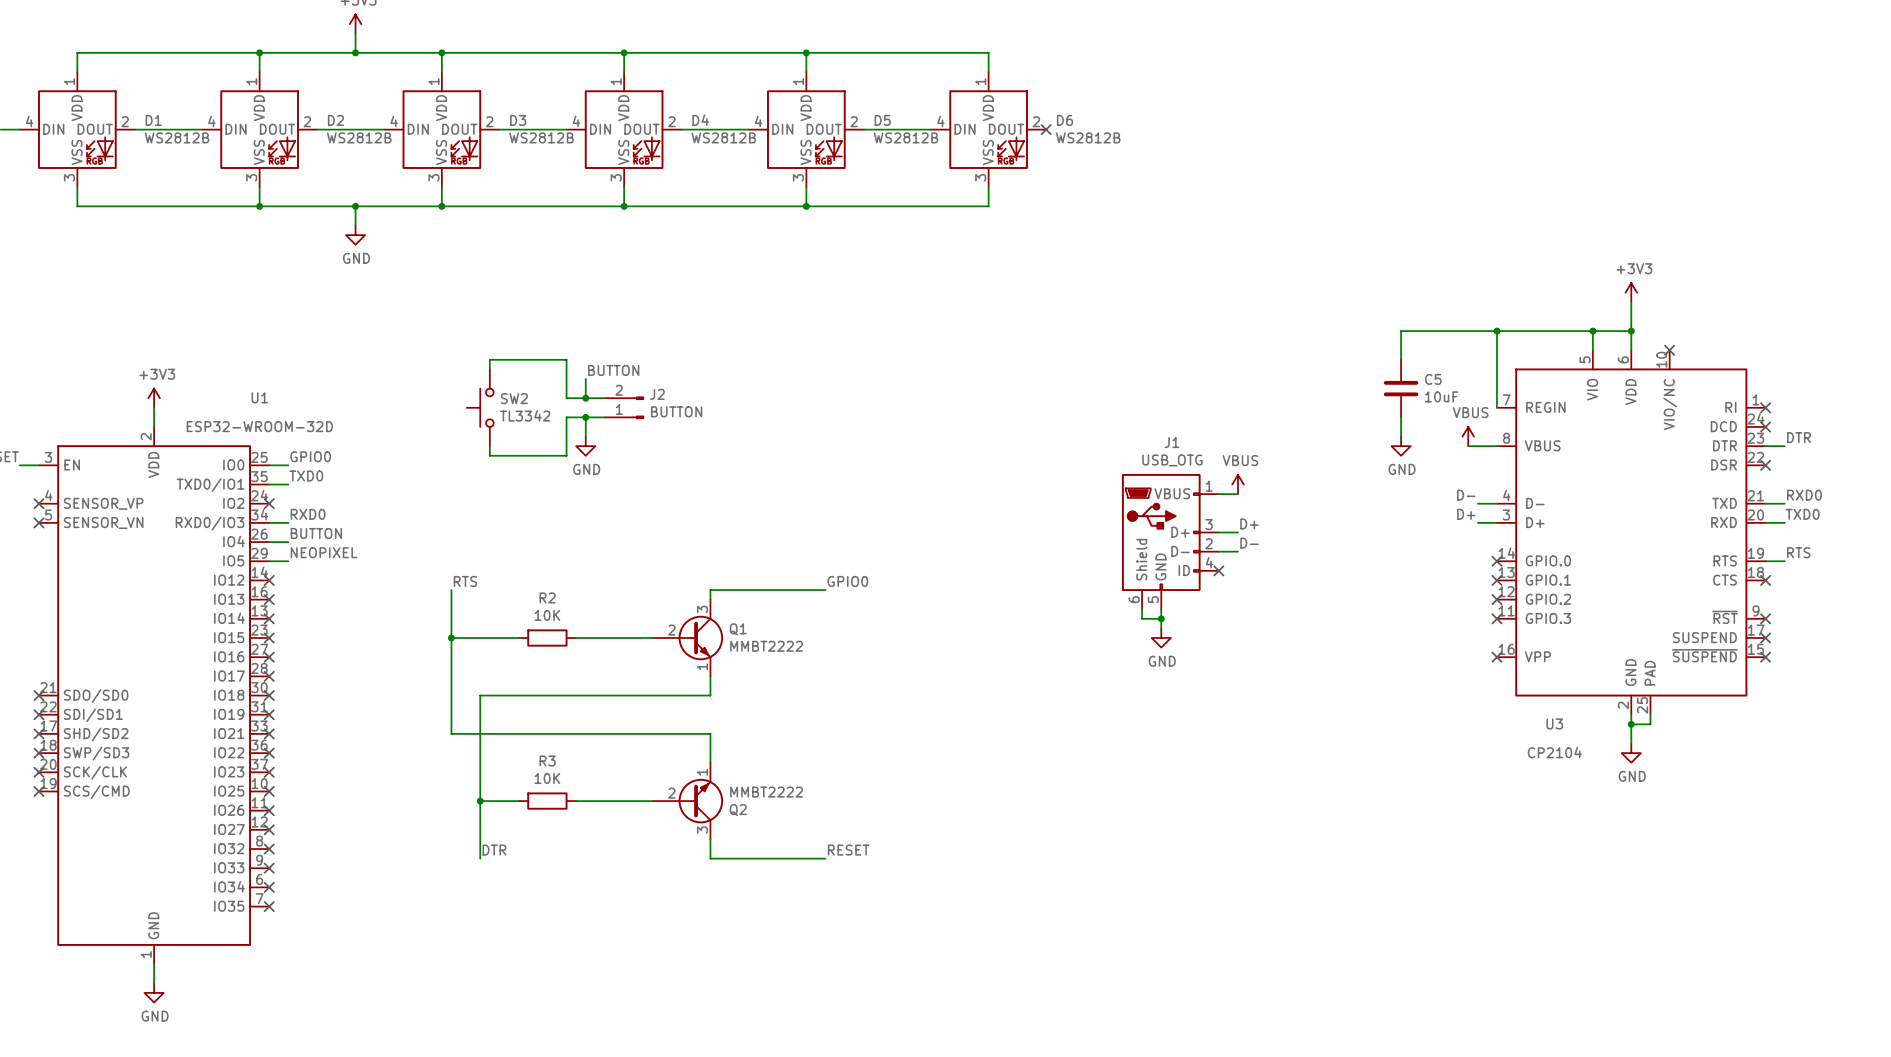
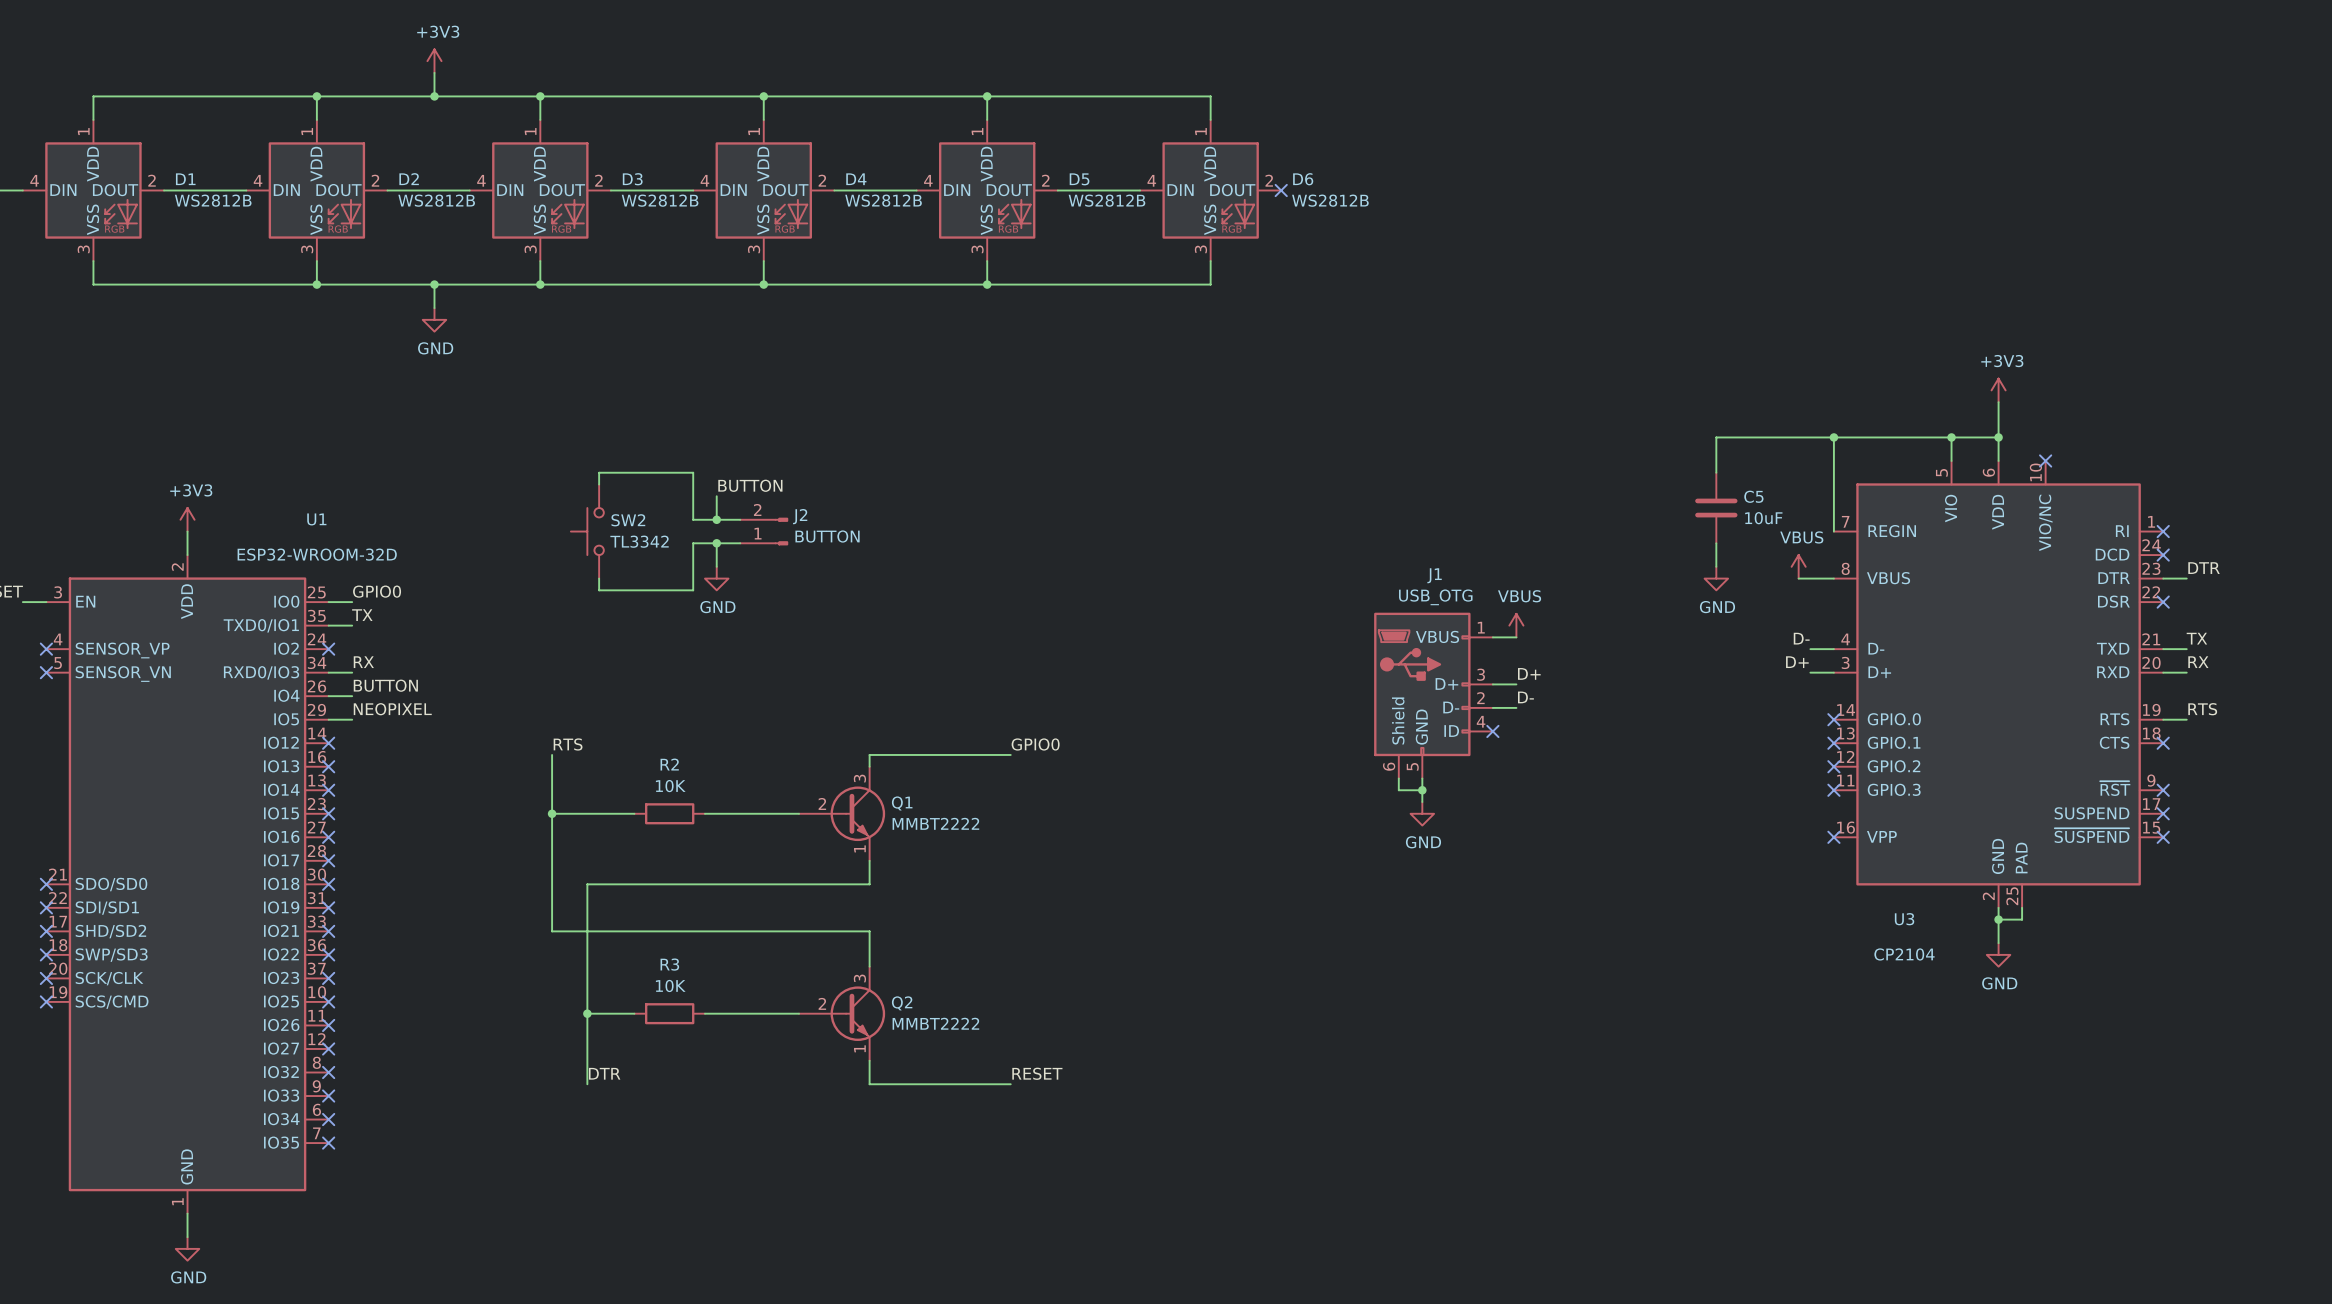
label: TXD0 (306, 475) -> TX (362, 615)
label: RXD0 (1804, 495) -> TX (2196, 638)
label: RXD0 (308, 514) -> RX (363, 662)
label: TXD0 (1802, 514) -> RX (2198, 662)
Q2 flip: as is (700, 801) -> up-down (857, 1013)

